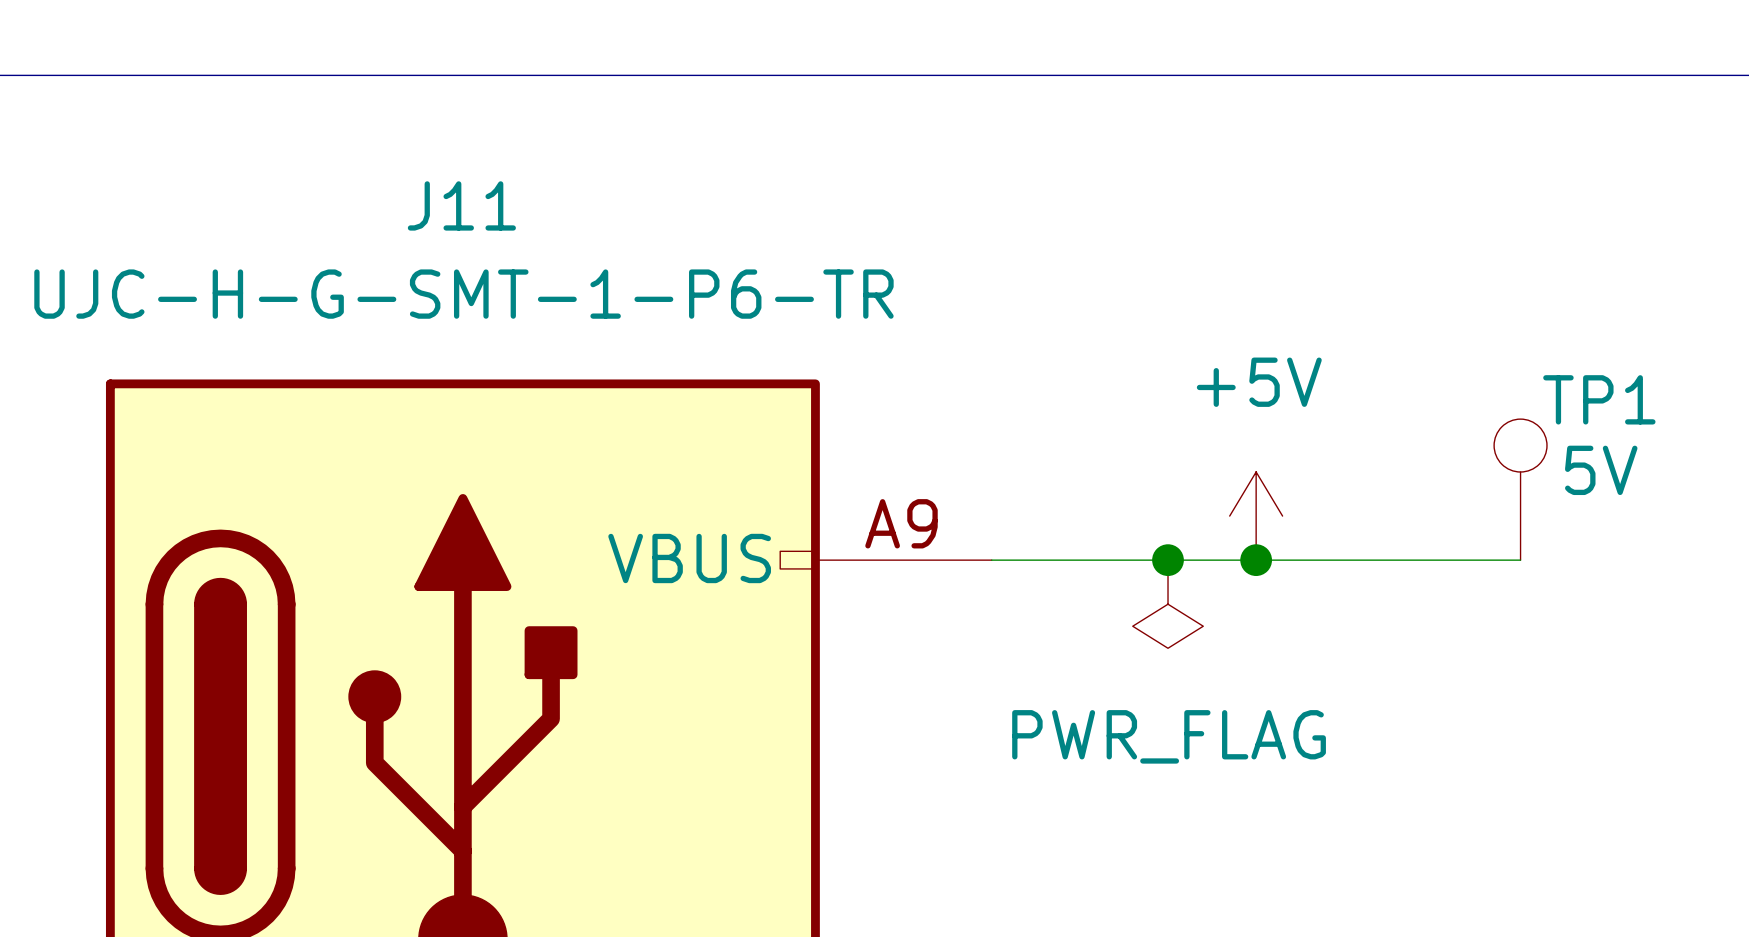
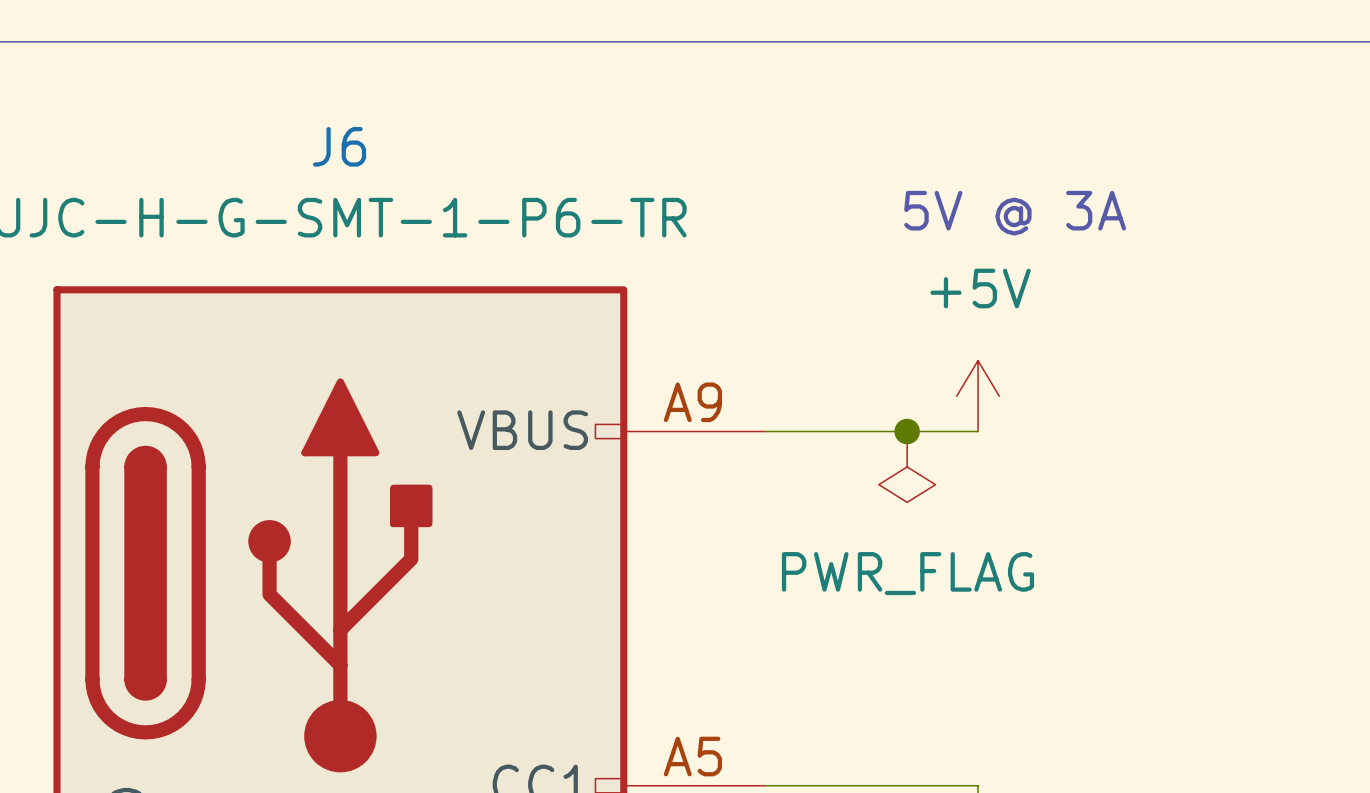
J11 name: J11 (461, 205) -> J6 (339, 146)
text: none -> 5V @ 3A (1015, 213)
TP1: 5V (1520, 489) -> none
wire: (1256, 560) (1520, 560) -> none
junction: (1256, 560) -> none

